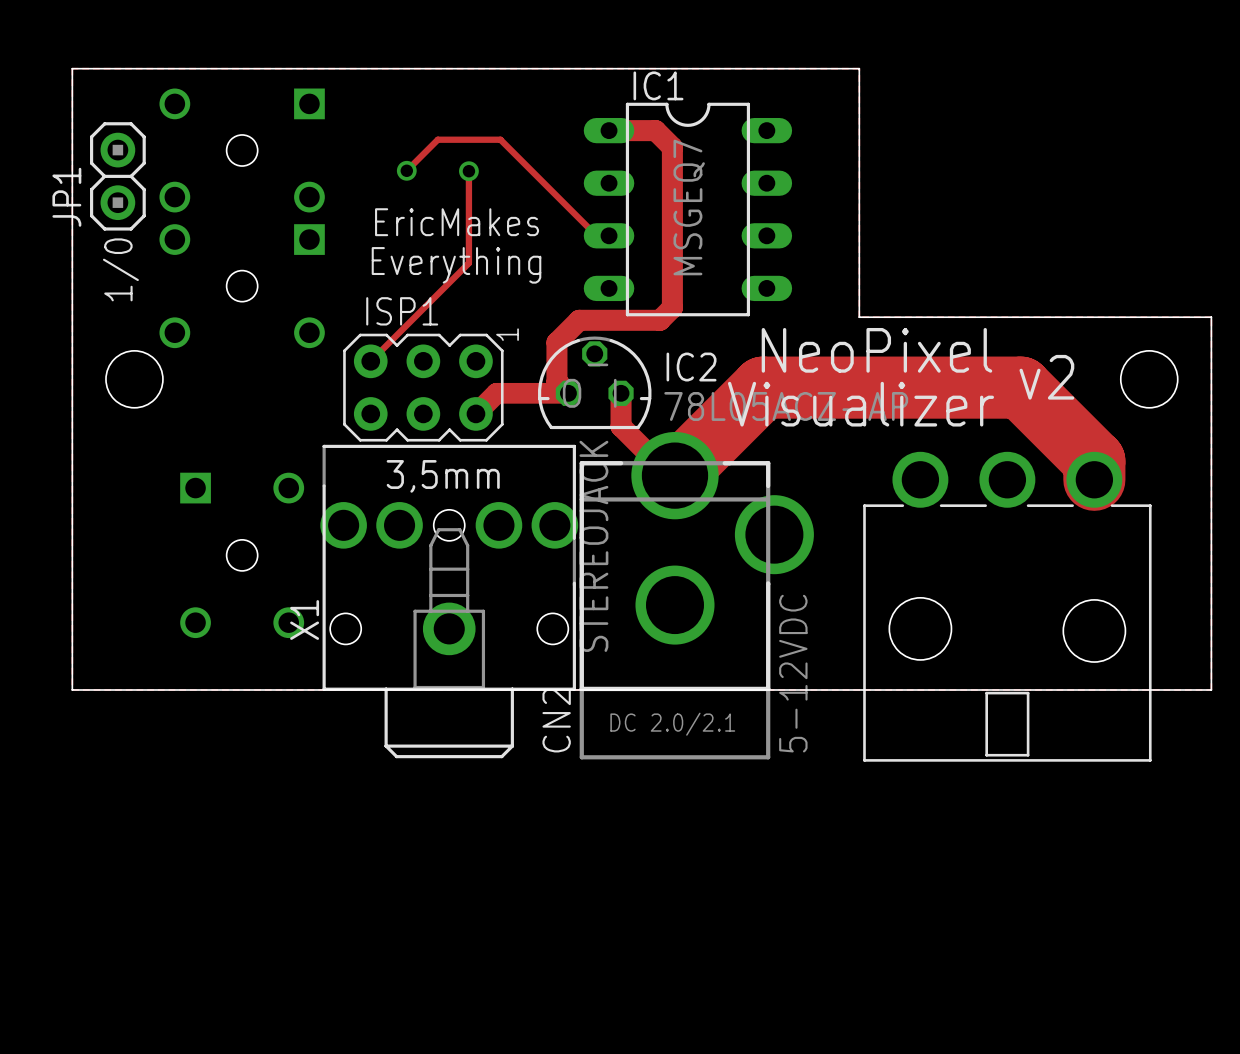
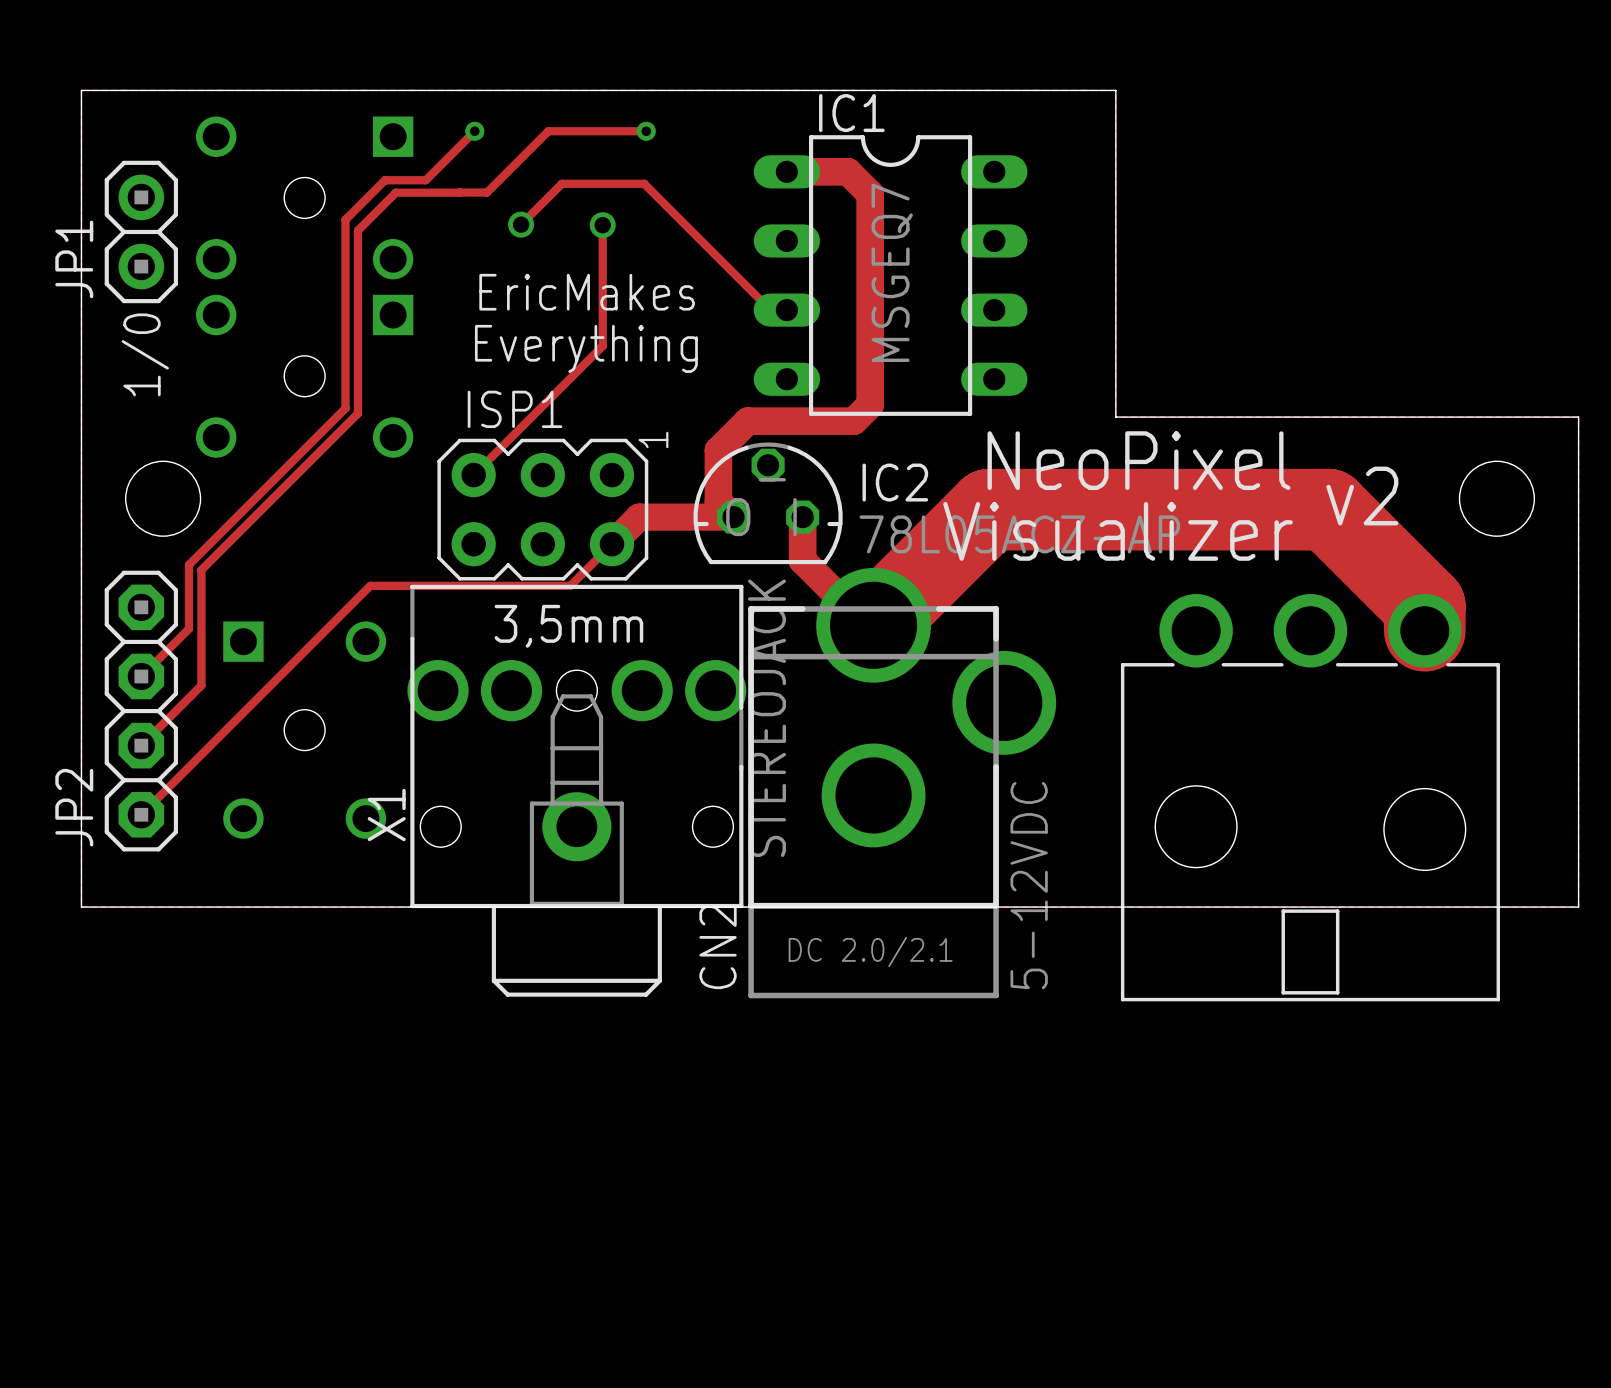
track: none -> (474, 131) (425, 180) (384, 180) (345, 219) (345, 408) (188, 564) (188, 628) (141, 676)
via: none -> (474, 131)
track: none -> (646, 131) (548, 131) (487, 192) (459, 192)
via: none -> (646, 131)
track: none -> (459, 192) (395, 192) (357, 230) (357, 413) (201, 570) (201, 685) (141, 745)
track: none -> (611, 544) (570, 585) (370, 585) (141, 814)
JP2: none -> (141, 711)

